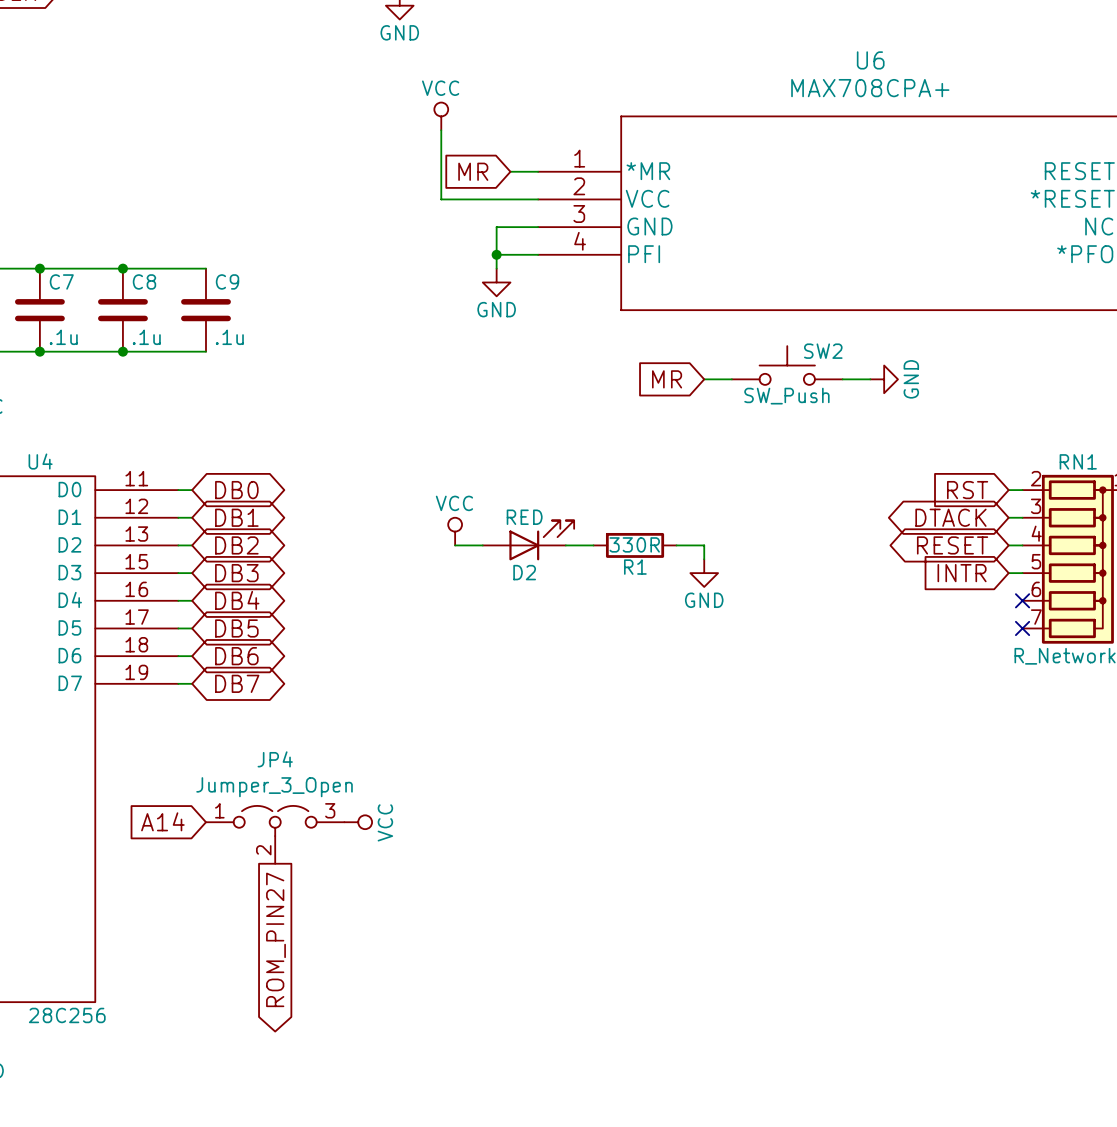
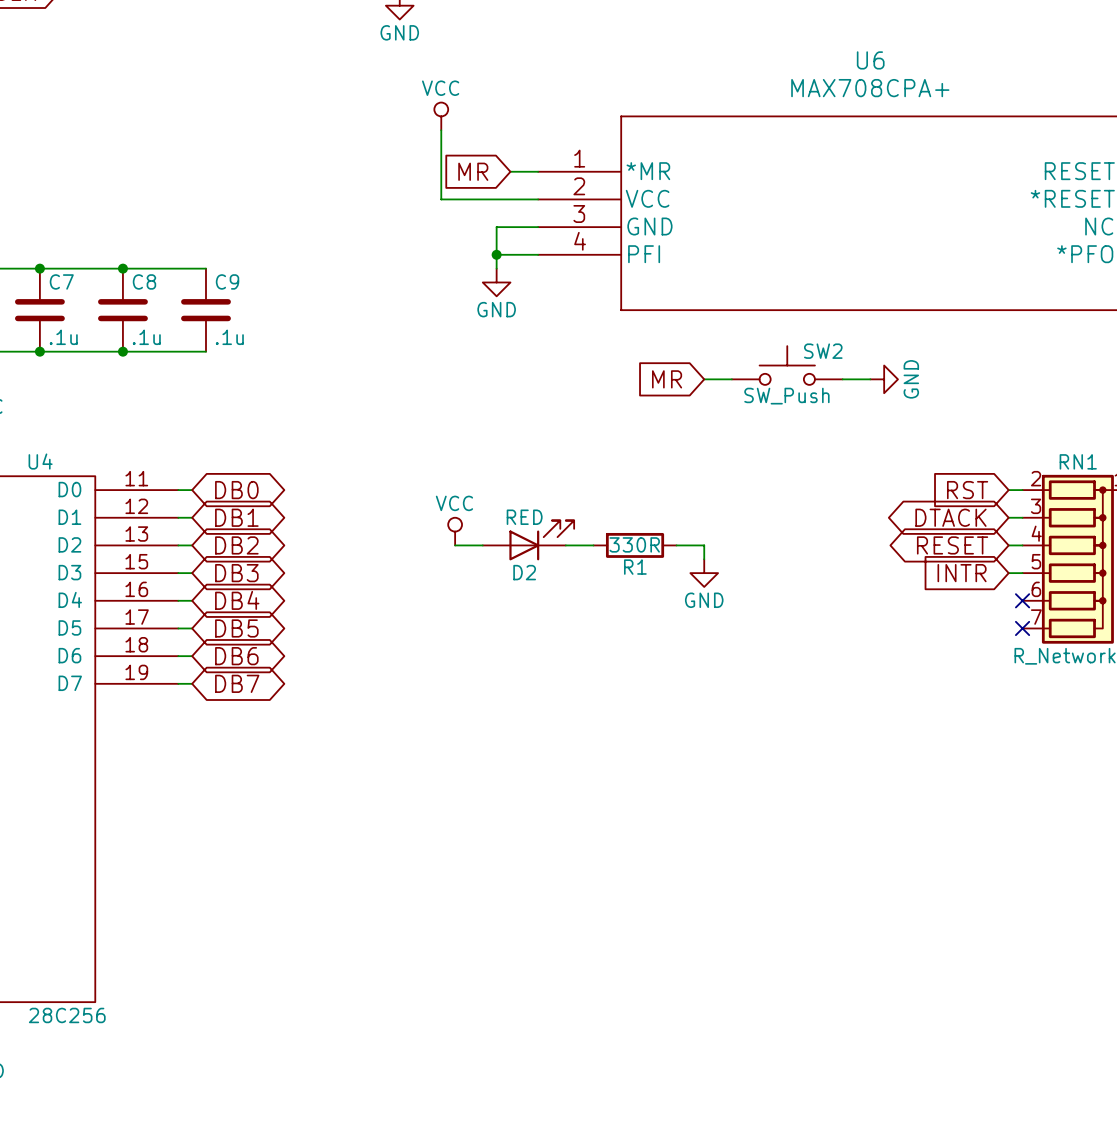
global label: A14 (162, 821) -> none
power symbol: VCC (358, 822) -> none
JP4: Jumper_3_Open (275, 834) -> none
global label: ROM_PIN27 (275, 939) -> none

